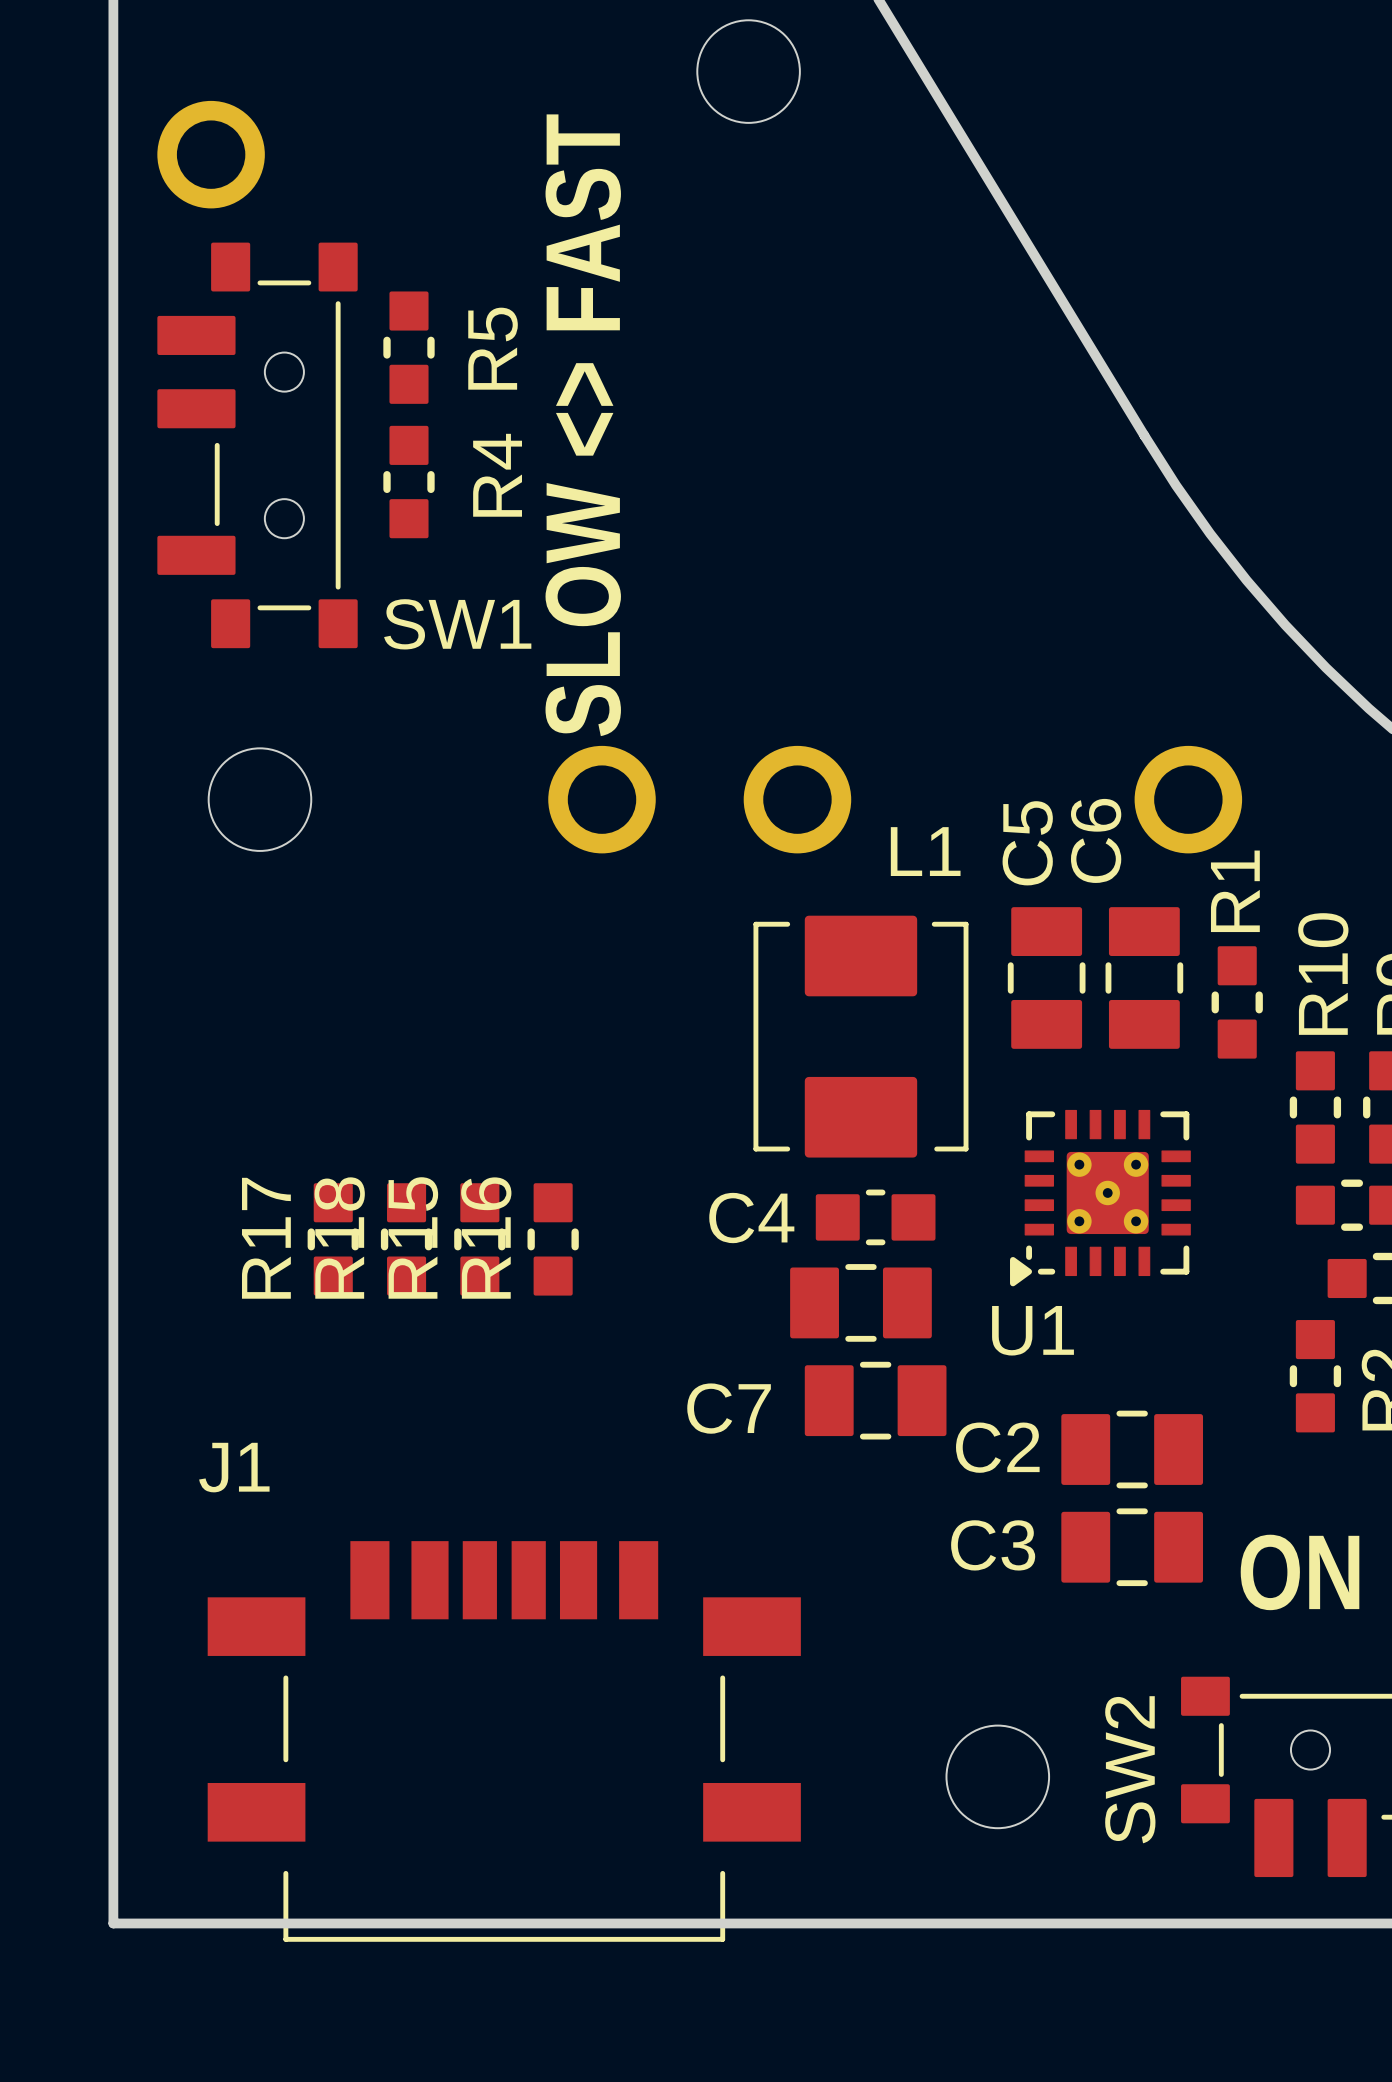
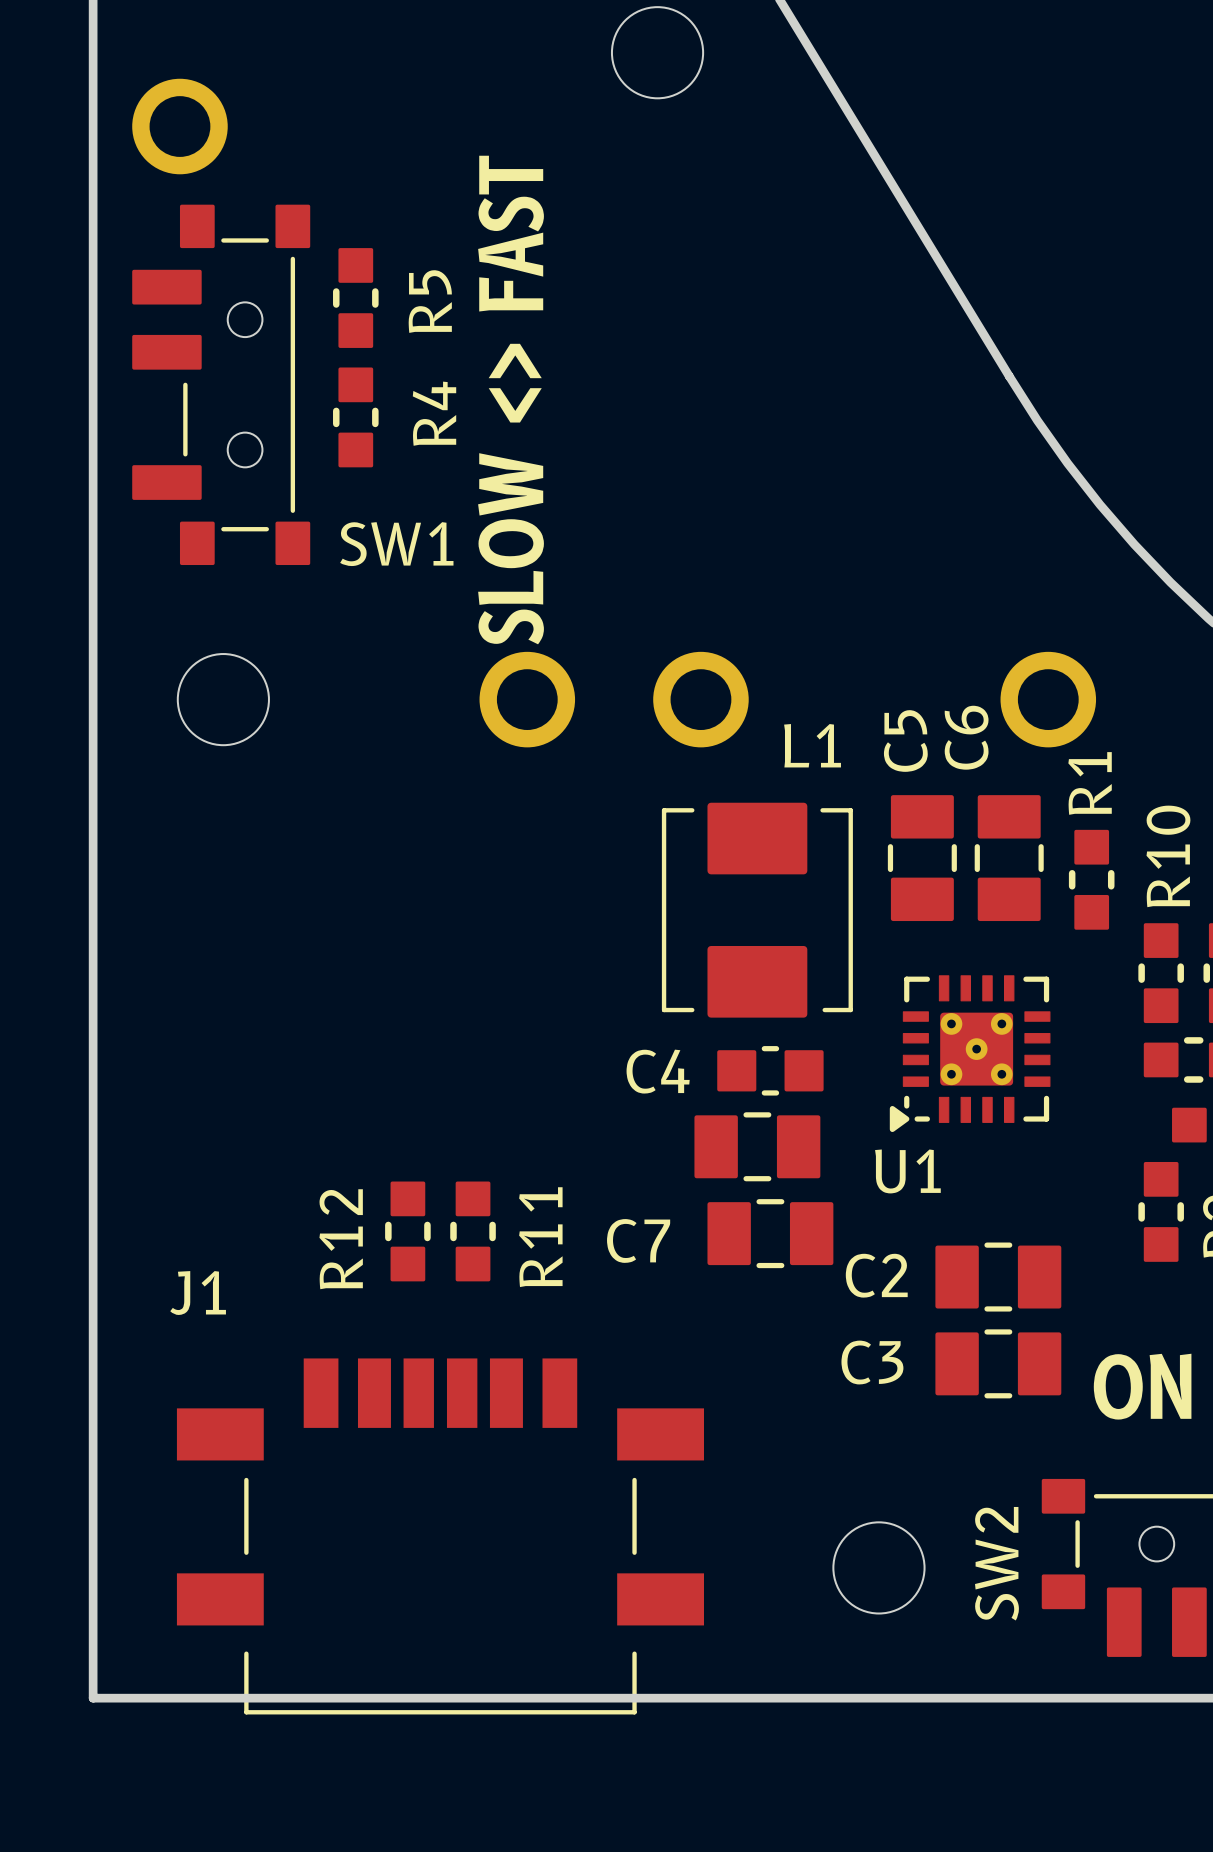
R17: (333, 1239) -> none
R18: (406, 1239) -> none
R15: (479, 1239) -> none
R16: (553, 1239) -> none
R12: none -> (407, 1231)
R11: none -> (473, 1231)

